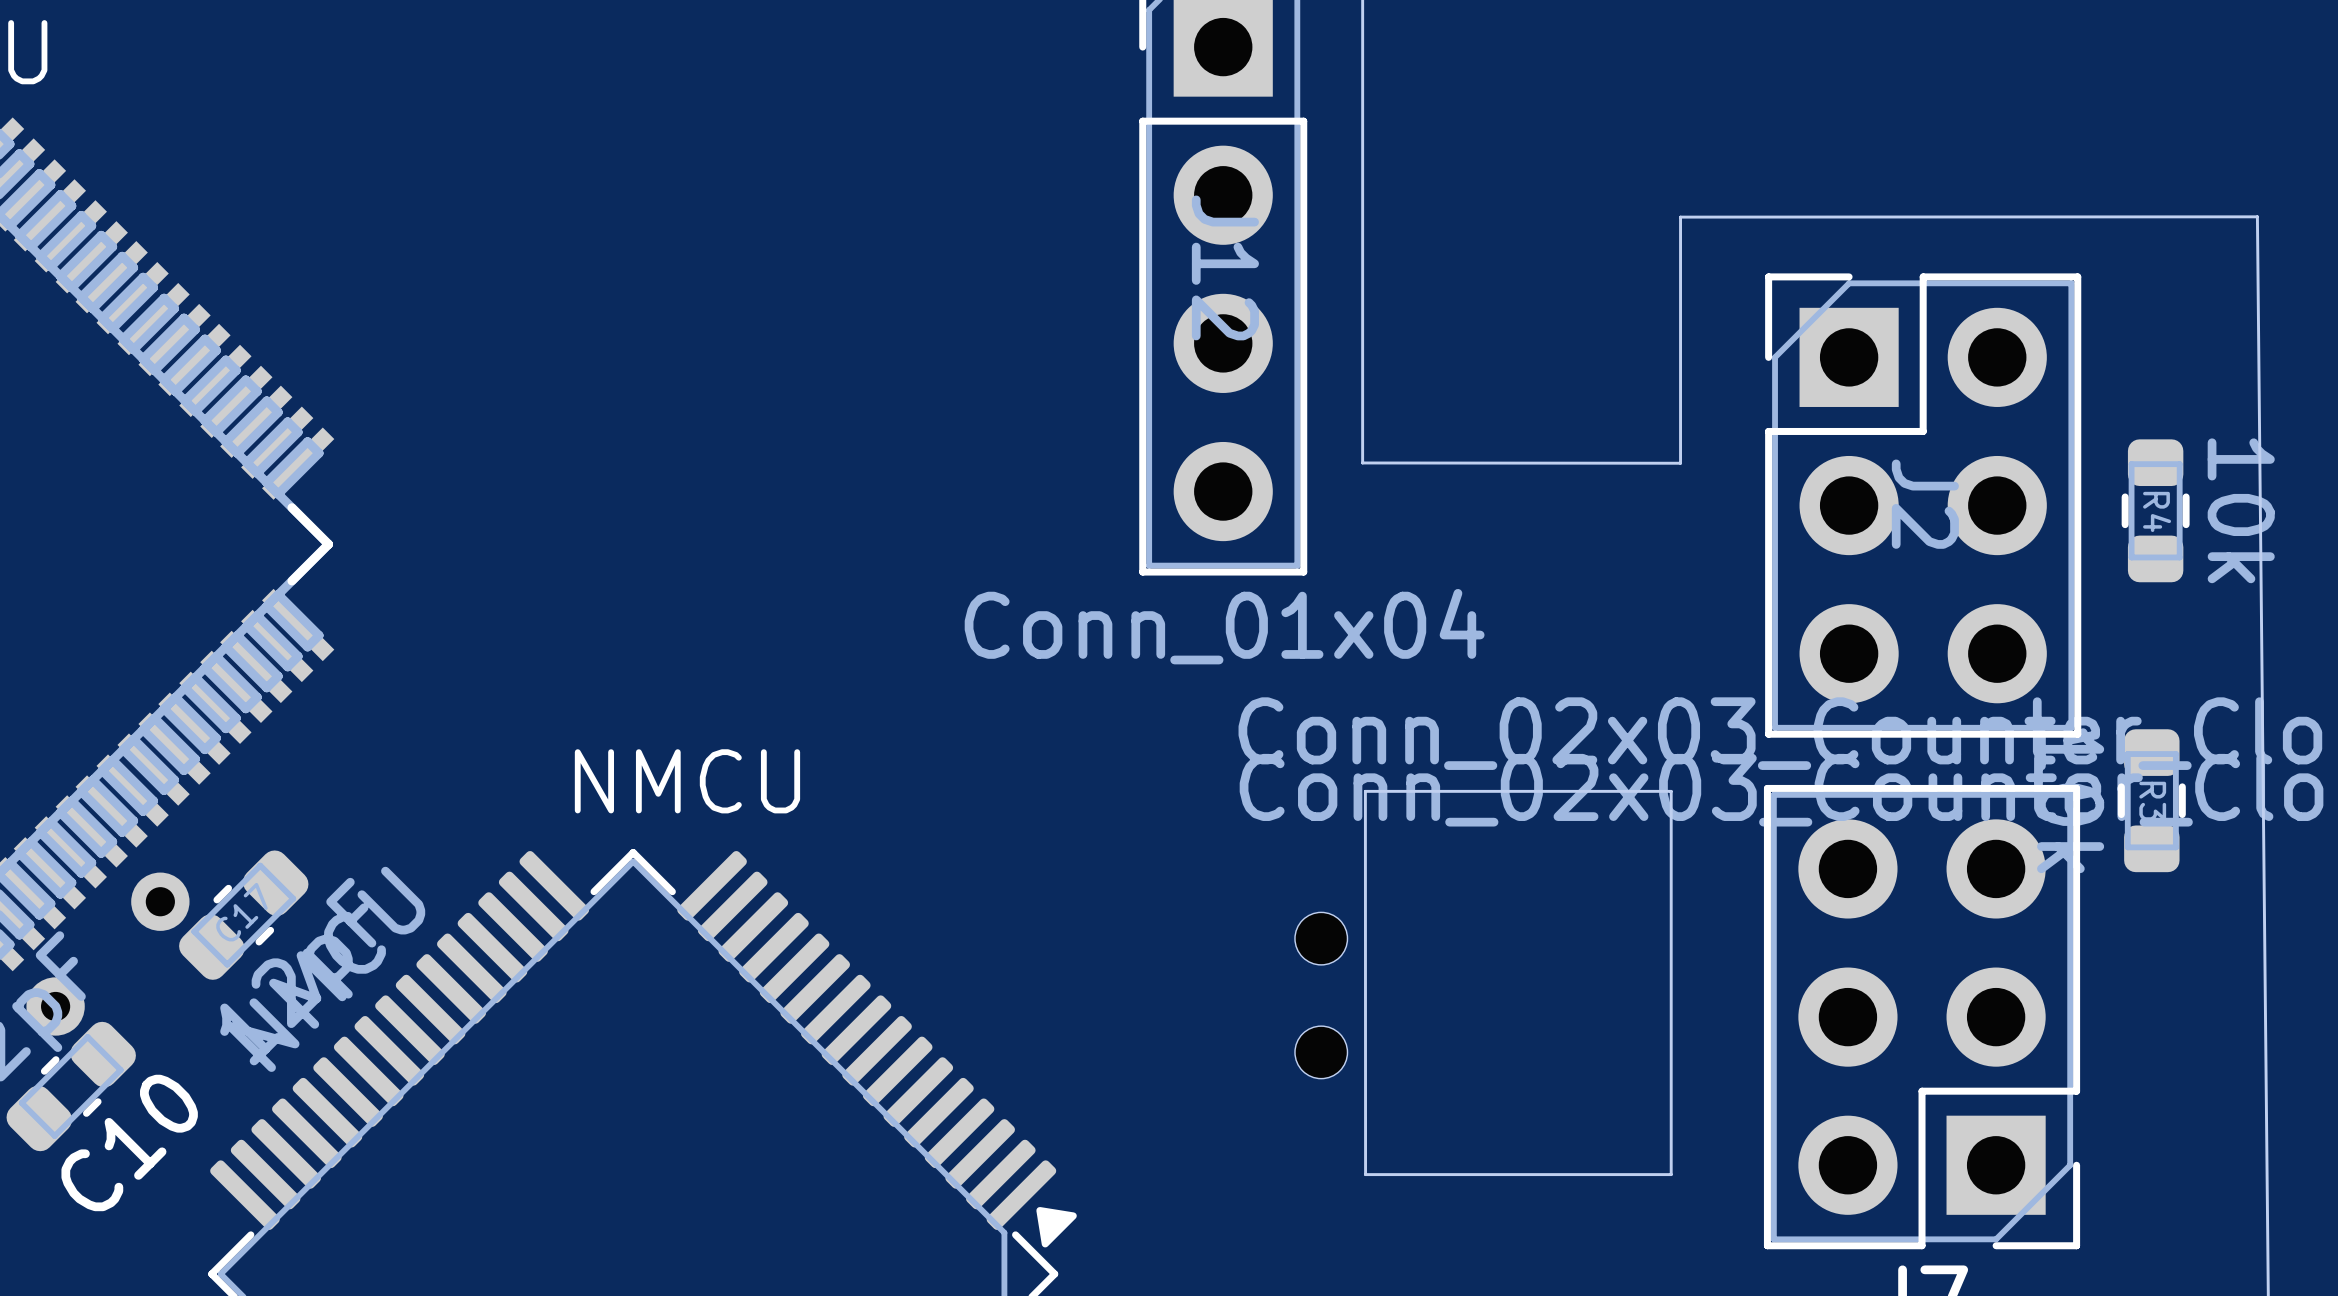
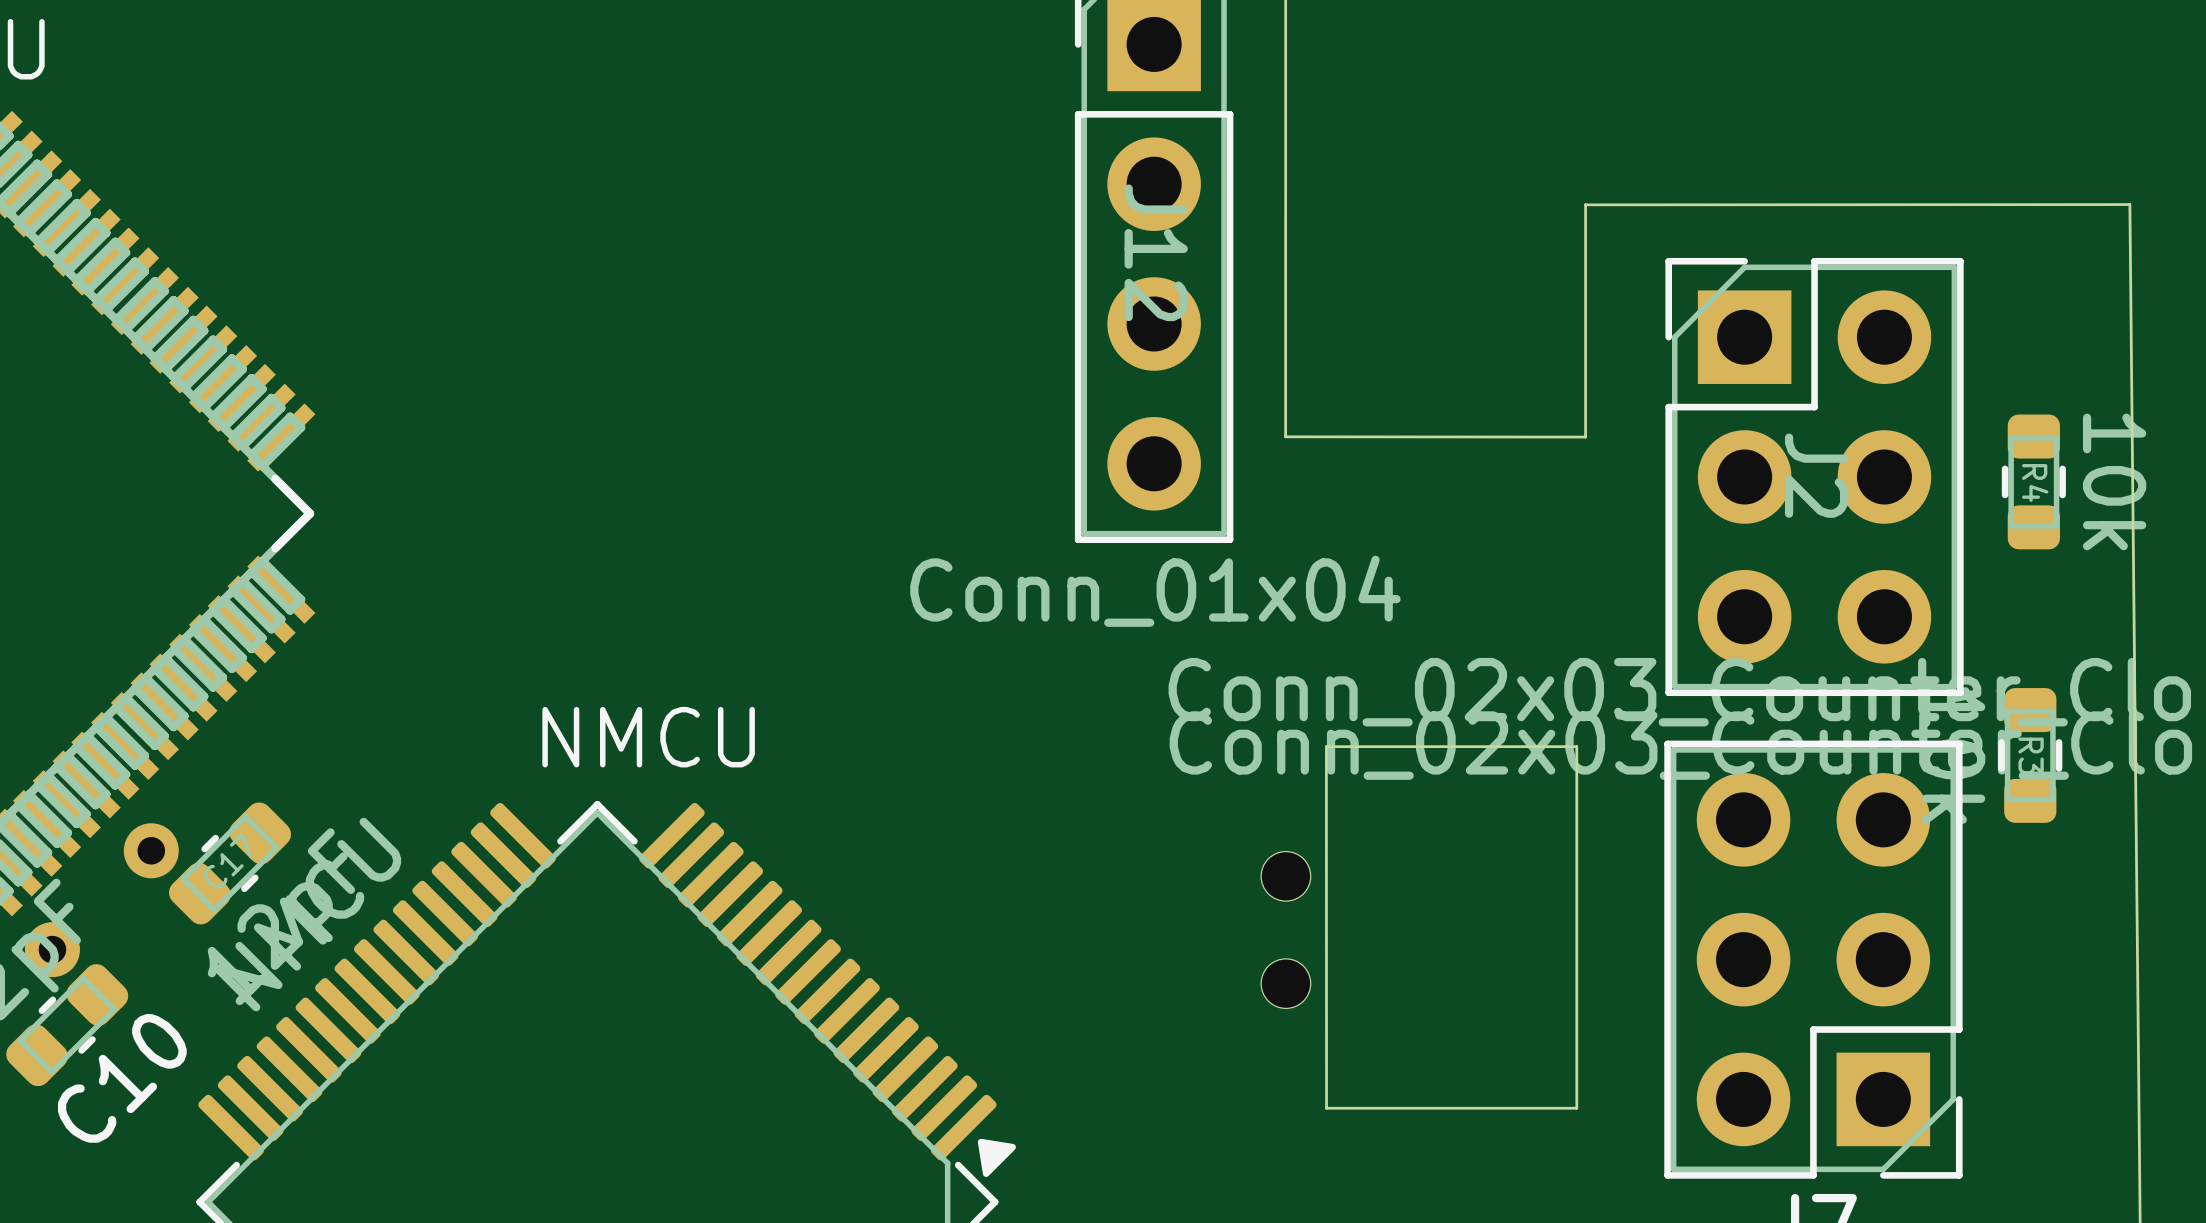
board edge: (1405, 791) (1365, 791) (1365, 1174) (1405, 1174) -> (1326, 746) (1326, 1108)
part position: (1321, 995) -> (1285, 929)

